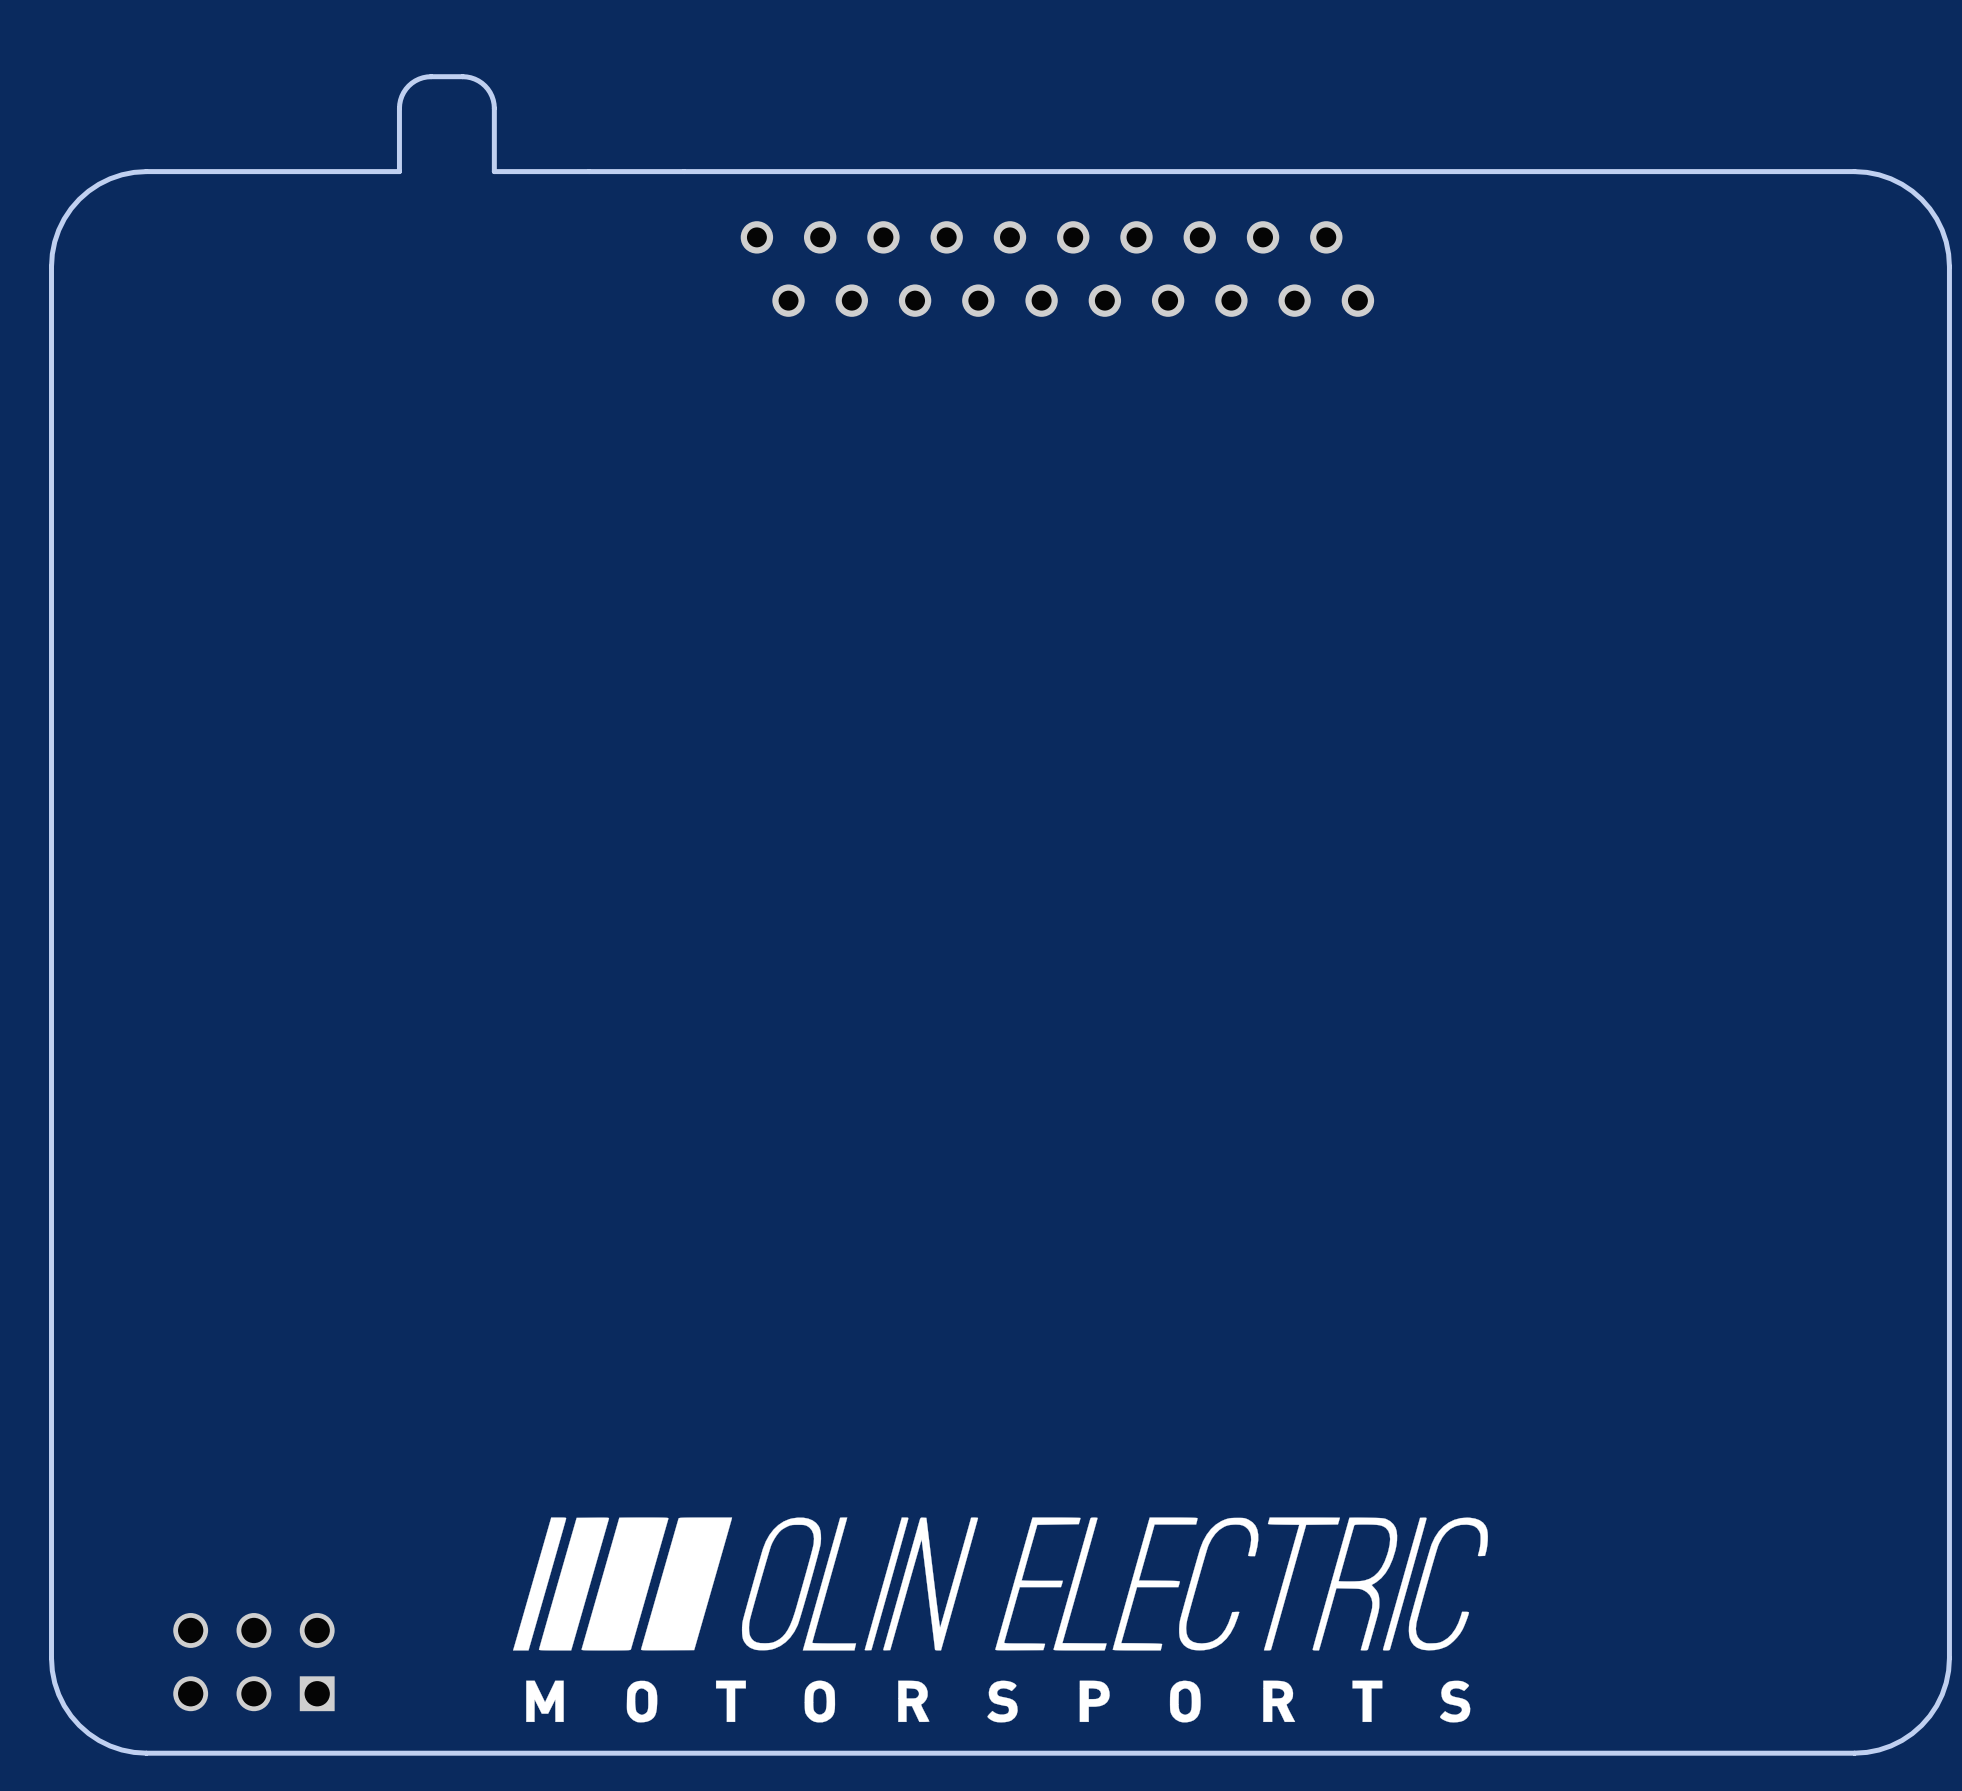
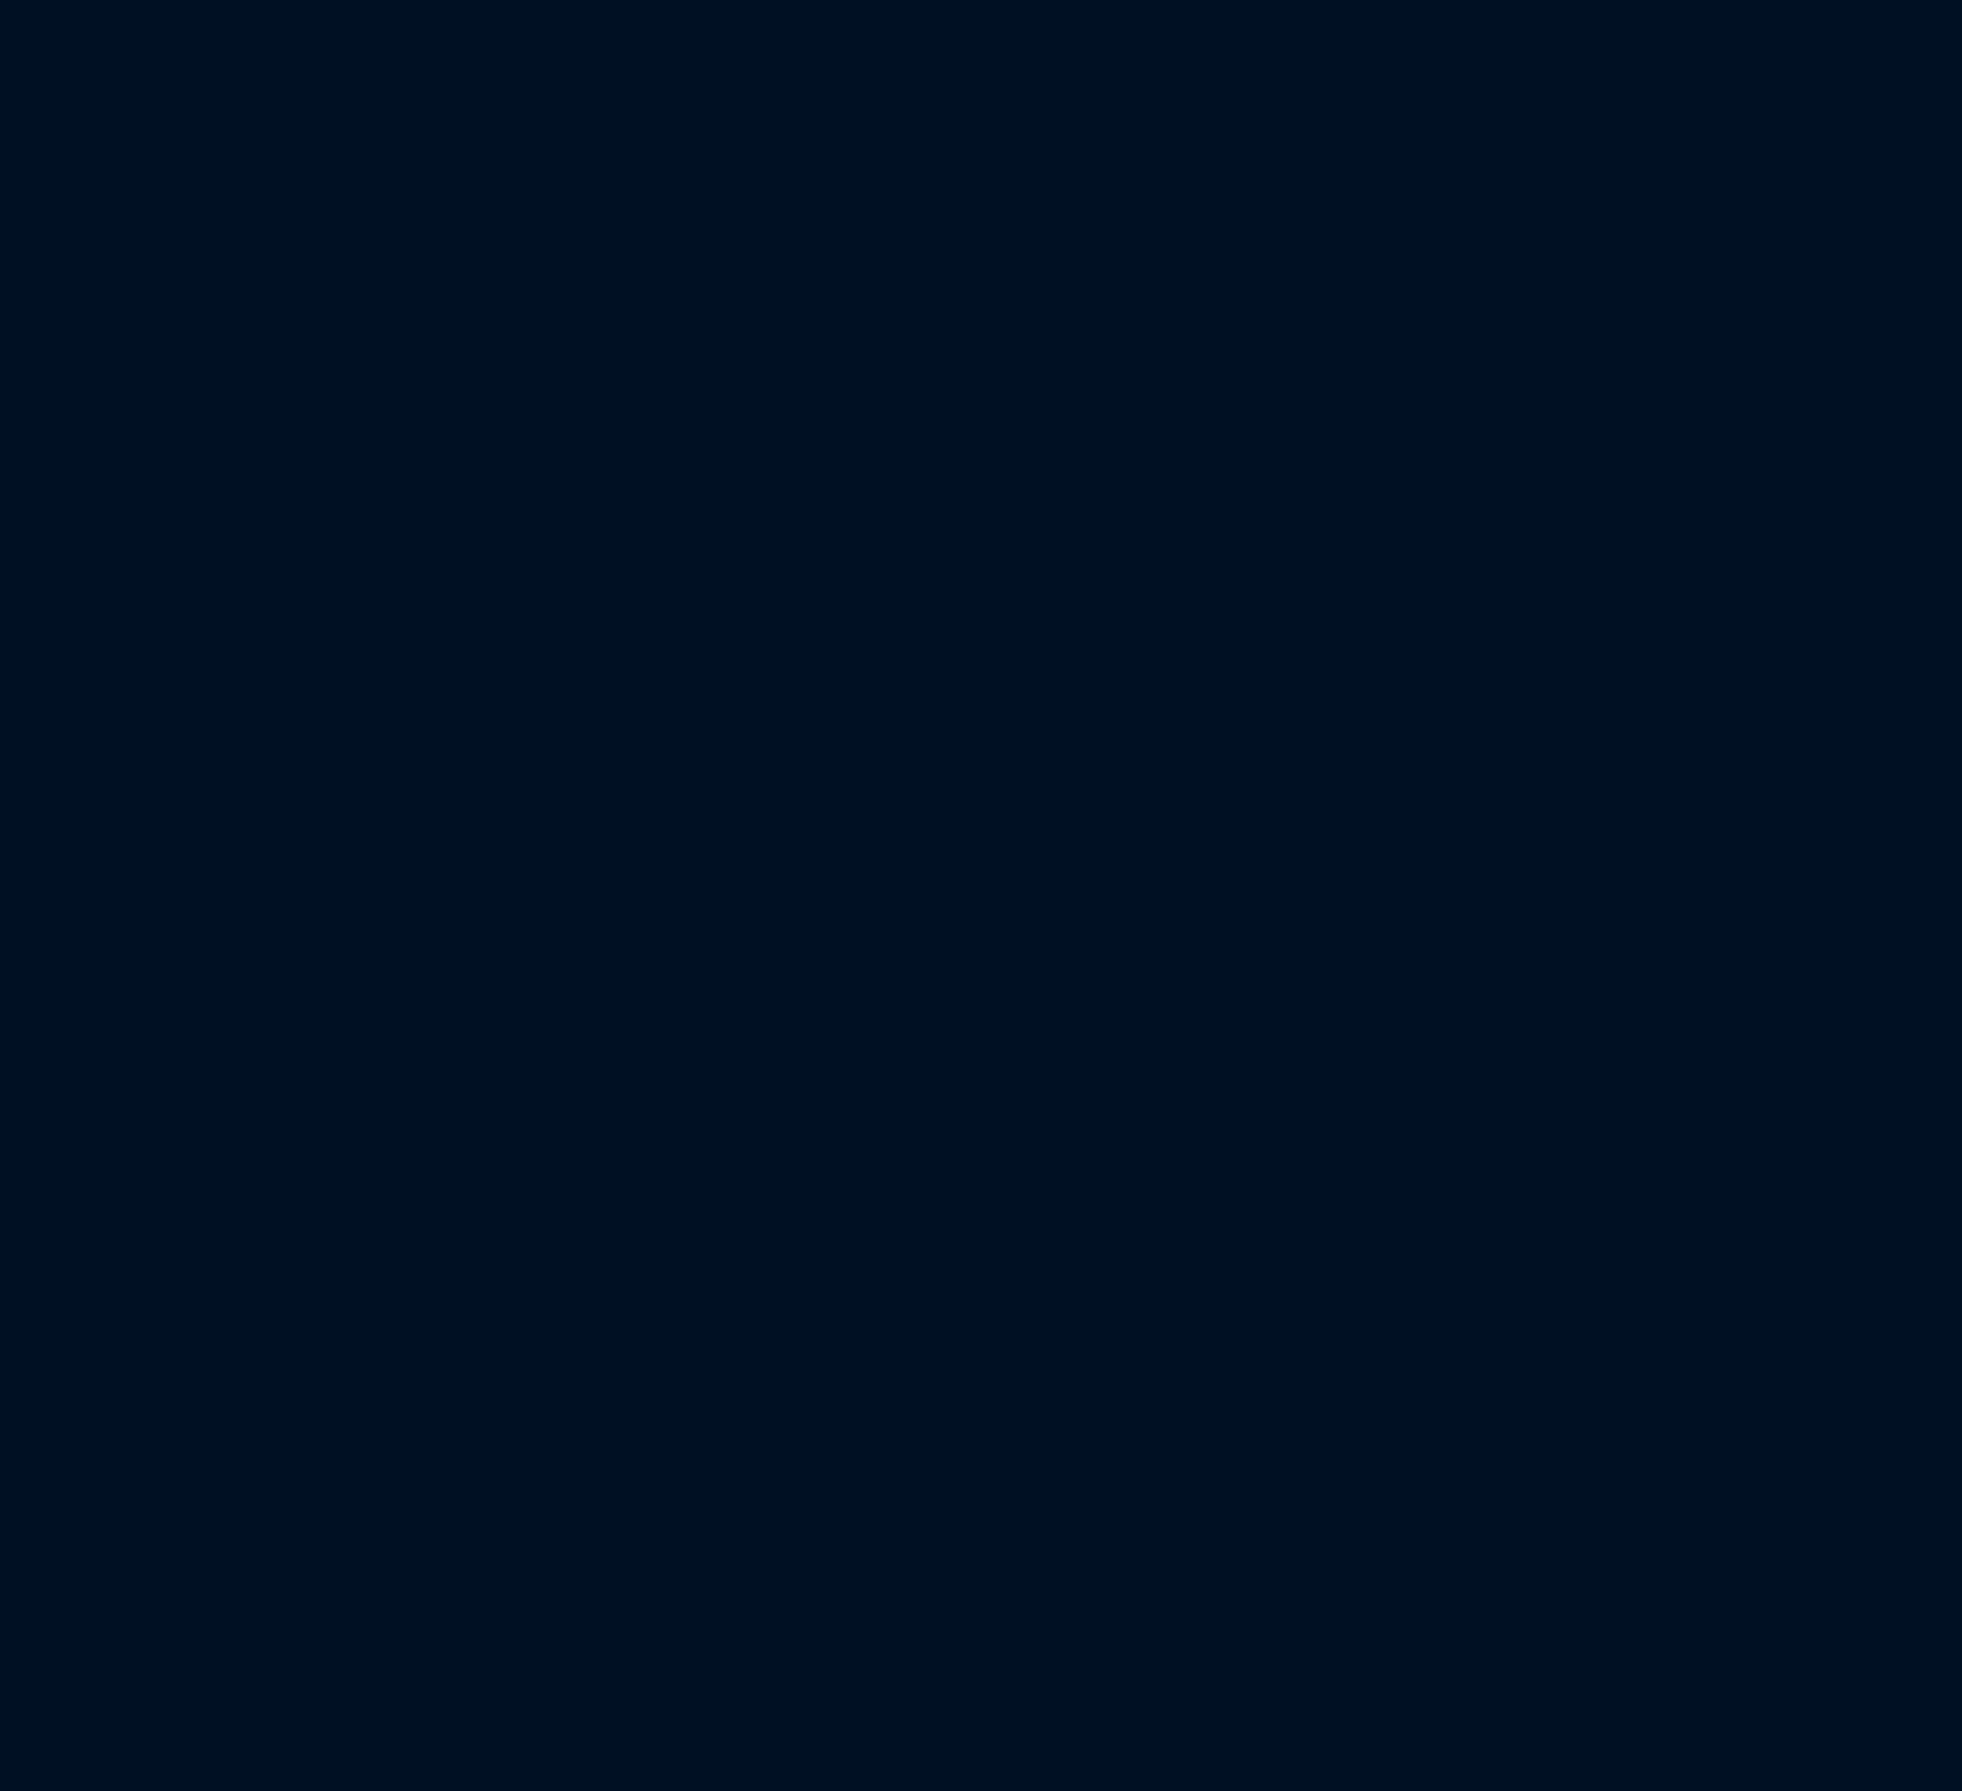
board edge: (462, 76) (422, 77) (411, 83) (403, 92) (399, 108) (399, 171) (146, 171) (121, 174) (98, 184) (79, 199) (64, 219) (54, 241) (51, 266) (51, 1658) (52, 1670) (58, 1694) (64, 1705) (79, 1725) (88, 1733) (110, 1745) (134, 1752) (146, 1753) (1854, 1753) (1866, 1752) (1890, 1745) (1902, 1740) (1921, 1725) (1936, 1705) (1942, 1694) (1948, 1670) (1949, 1658) (1949, 266) (1946, 241) (1942, 230) (1929, 208) (1921, 199) (1912, 191) (1890, 178) (1879, 174) (1854, 171) (494, 171) (493, 100) (487, 89) (481, 83) (474, 79) (462, 76) -> none
part: (1057, 269) -> none
drawing: [512, 1517, 1488, 1723] -> none
part: (253, 1662) -> none

